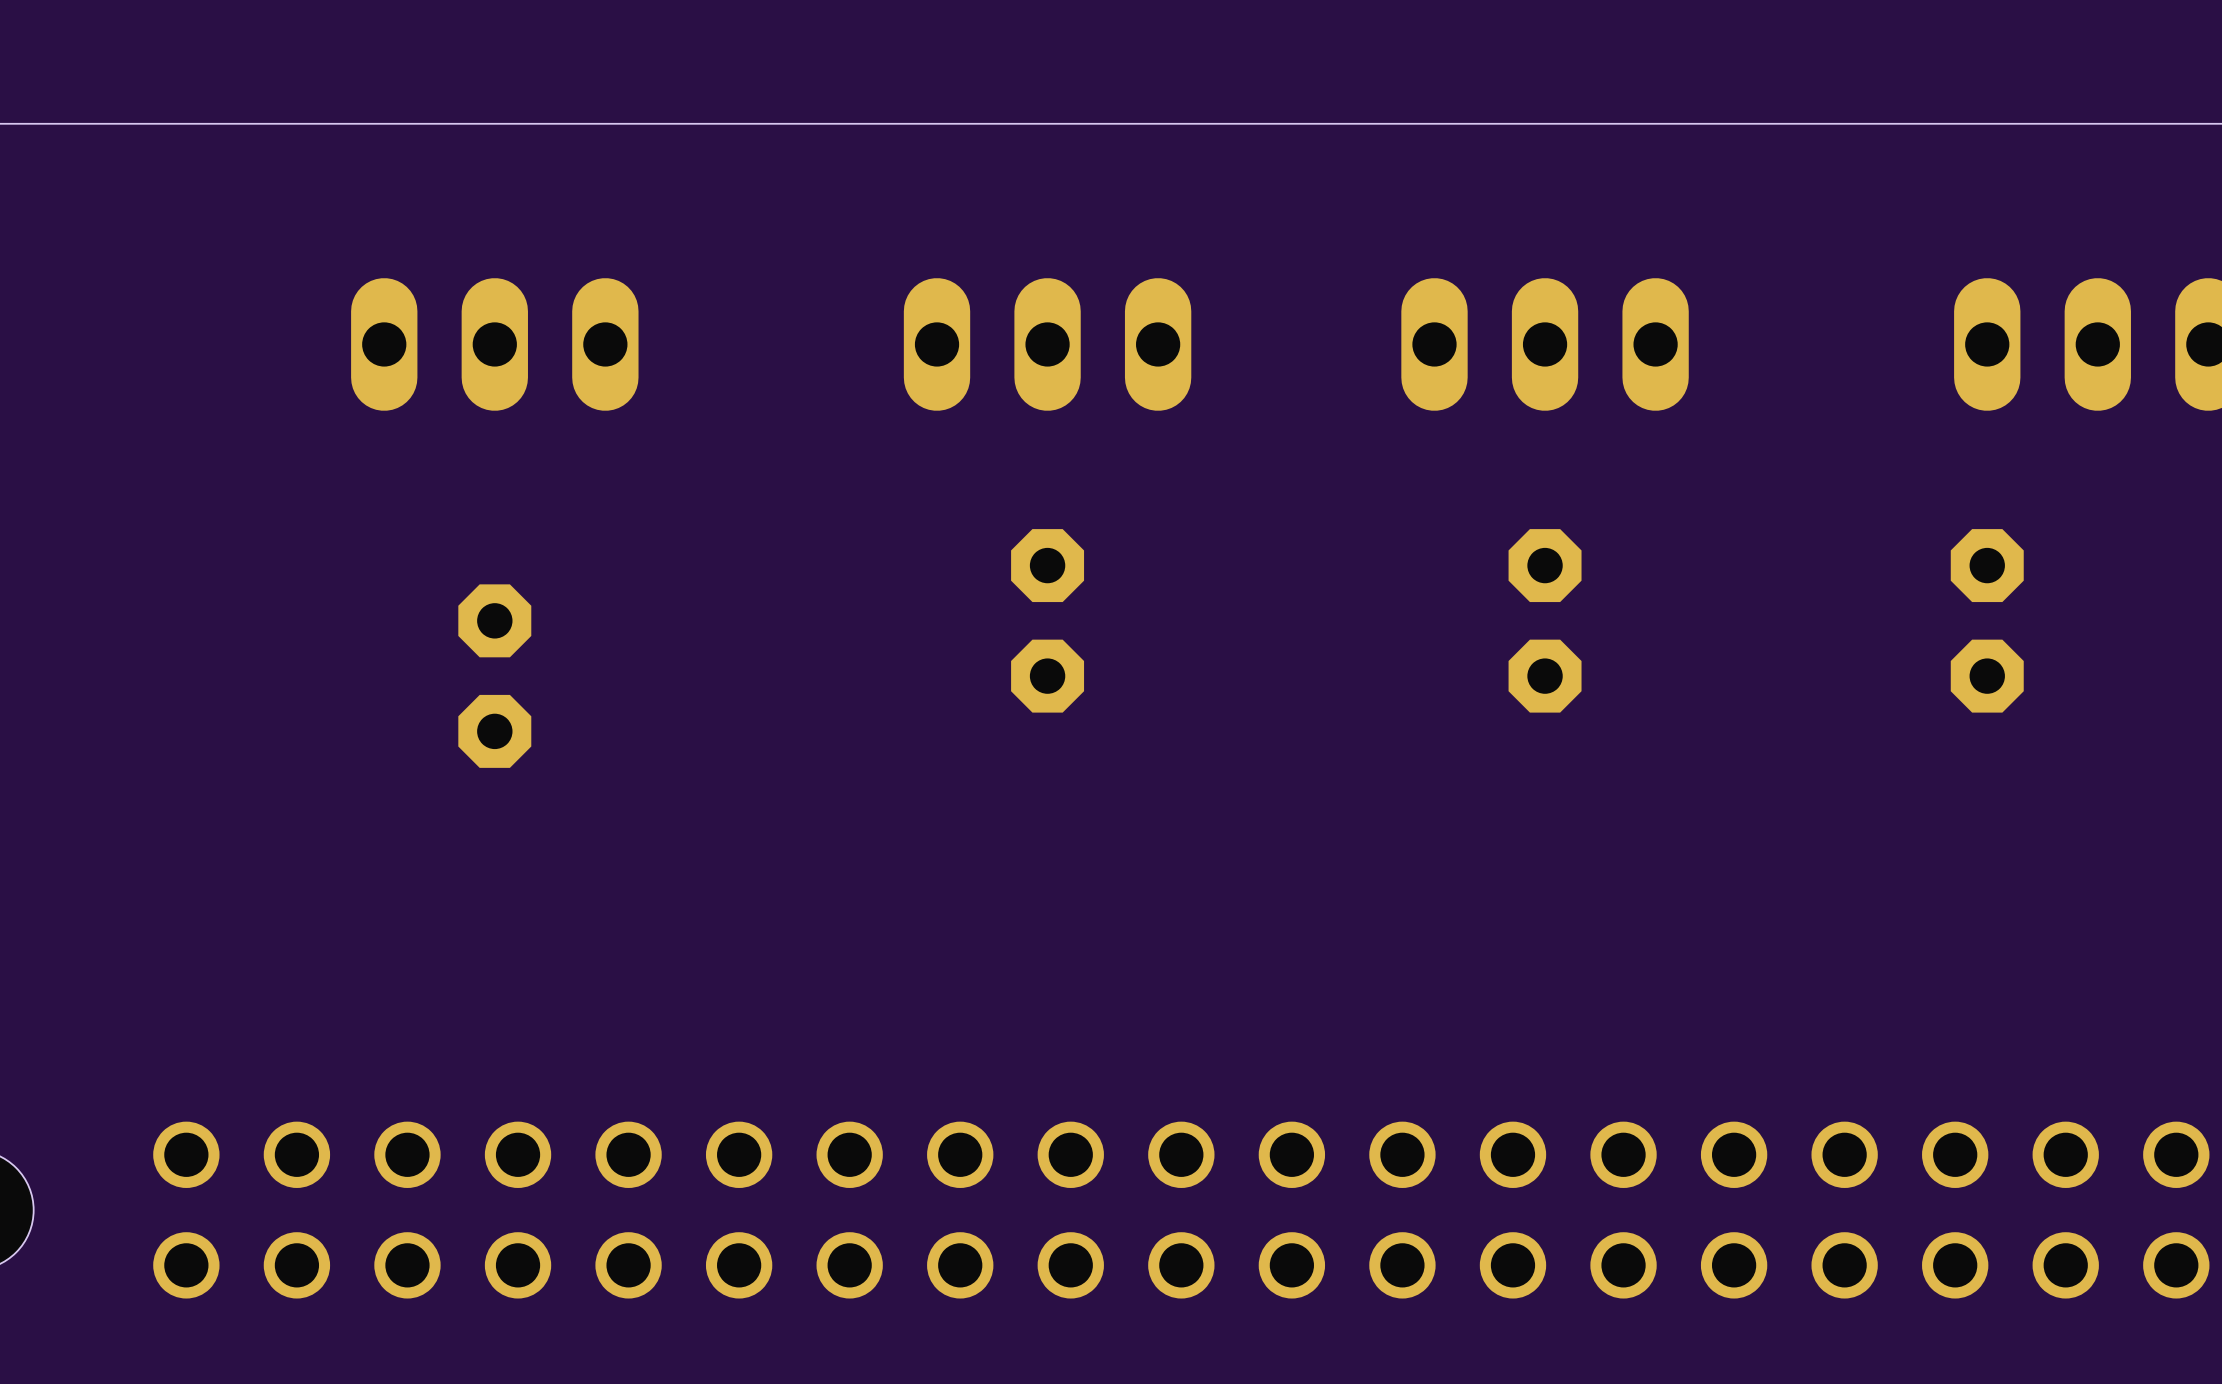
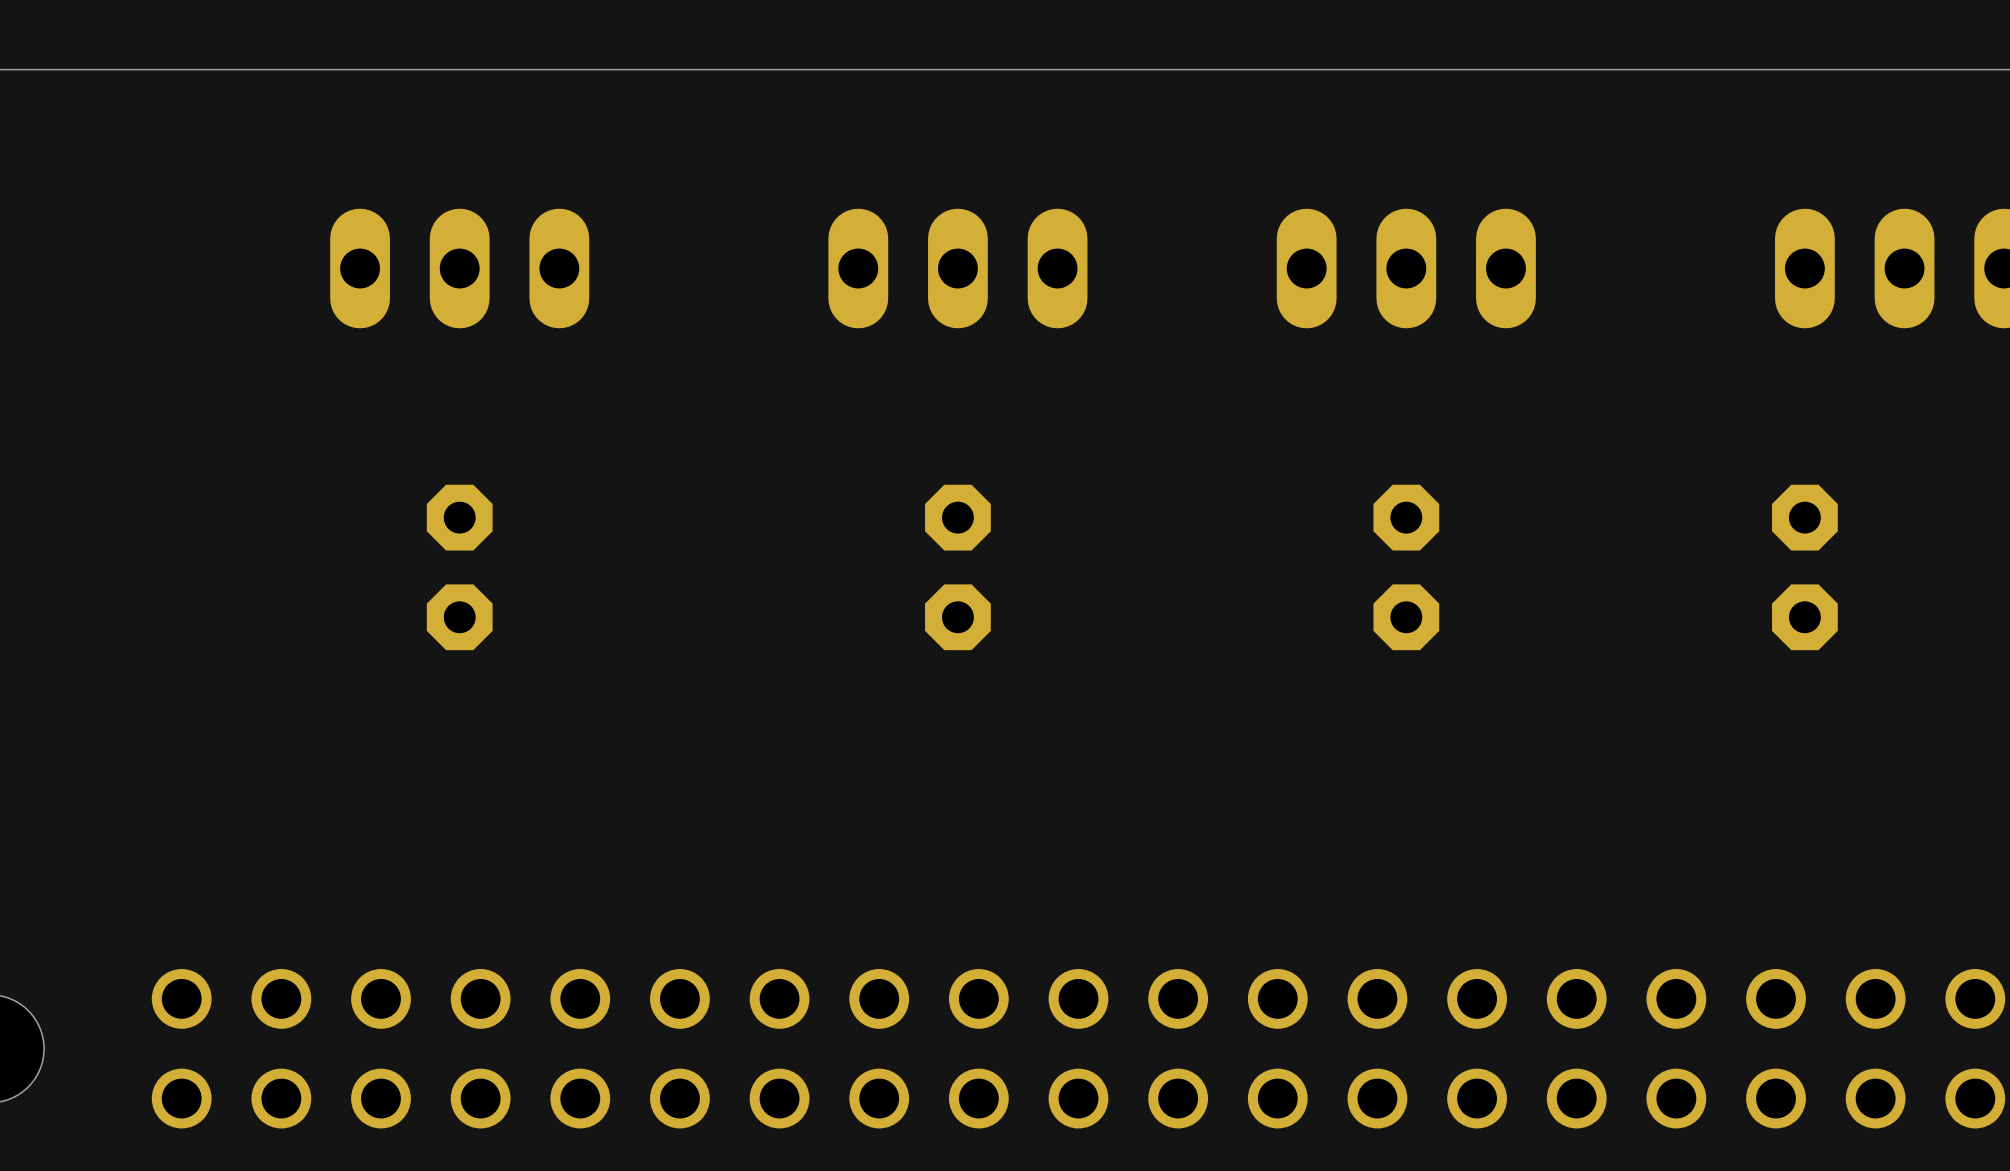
part position: (1047, 620) -> (957, 567)
part position: (1545, 620) -> (1406, 567)
part position: (1987, 620) -> (1804, 567)

